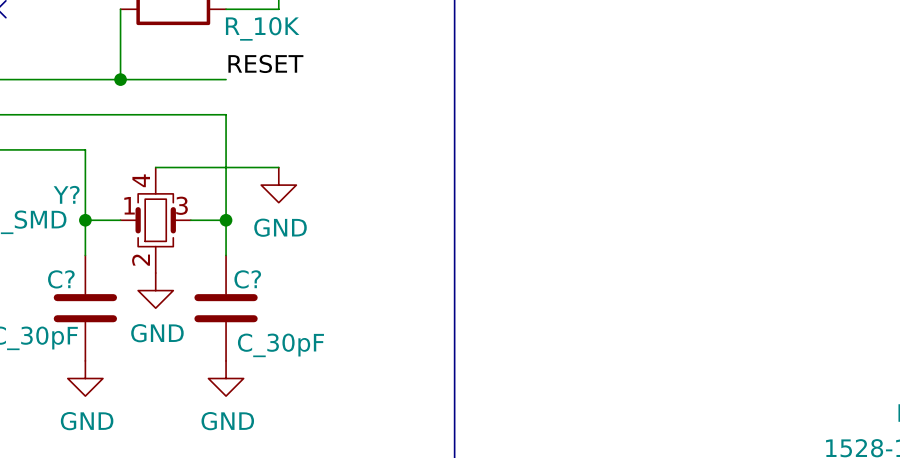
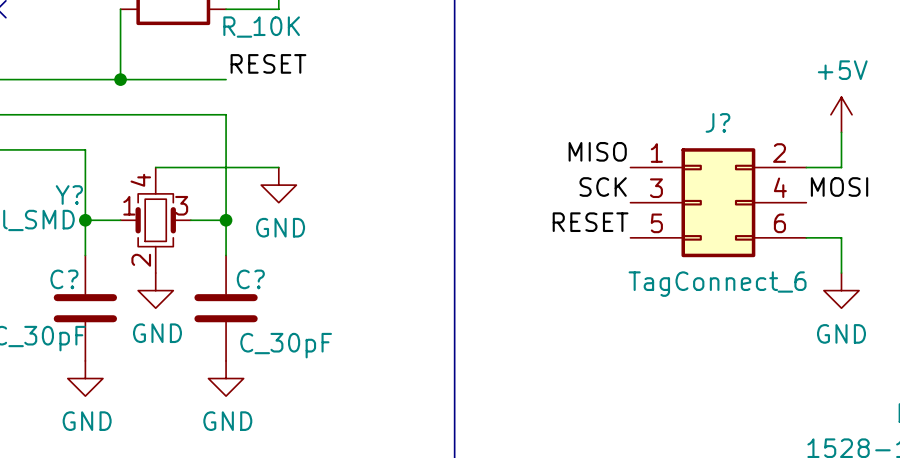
power symbol: none -> +5V (841, 114)
wire: none -> (841, 132) (841, 167) (806, 167)
label: none -> MISO (597, 151)
label: none -> SCK (603, 187)
label: none -> MOSI (839, 187)
J?: none -> TagConnect_6 (718, 202)
label: none -> RESET (590, 222)
wire: none -> (806, 237) (841, 237) (841, 273)
power symbol: none -> GND (841, 290)

